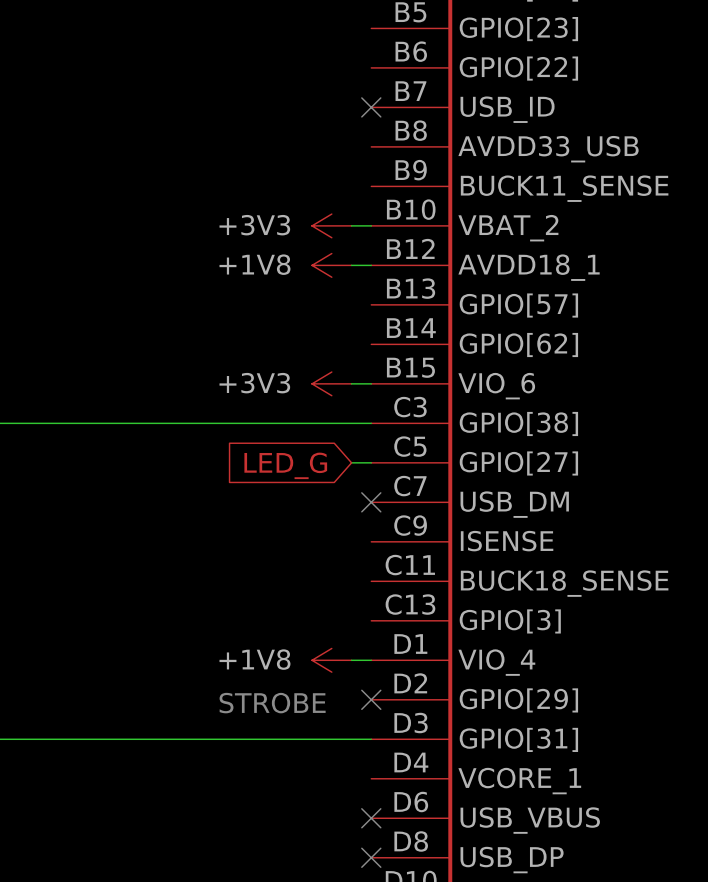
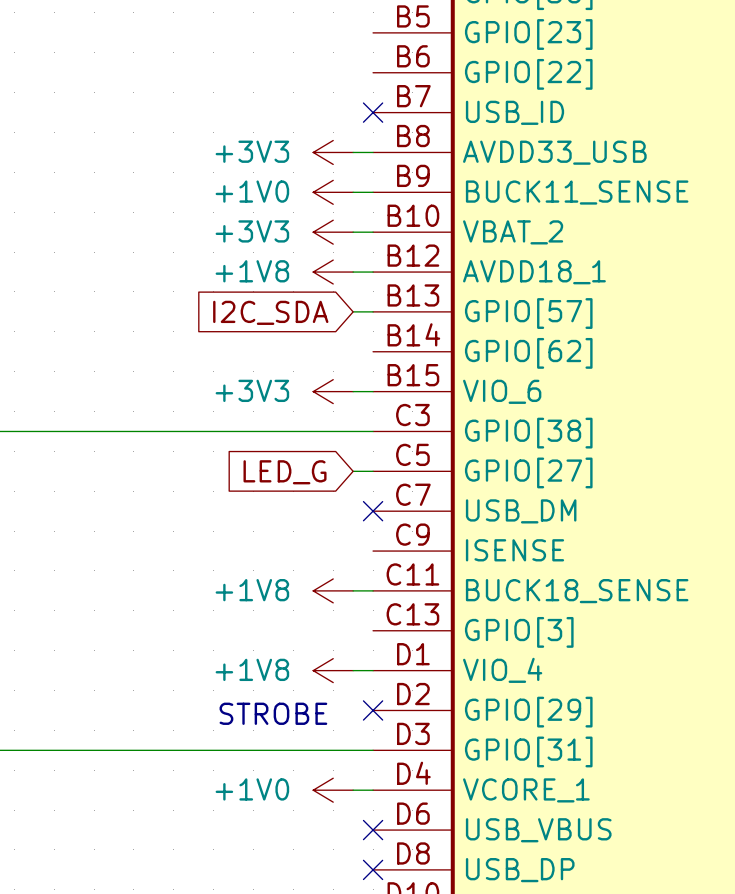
power symbol: none -> +3V3 (333, 152)
wire: none -> (353, 152) (373, 152)
power symbol: none -> +1V0 (333, 192)
wire: none -> (353, 192) (373, 192)
wire: none -> (353, 311) (373, 311)
global label: none -> I2C_SDA (270, 312)
power symbol: none -> +1V8 (333, 590)
wire: none -> (353, 590) (373, 590)
power symbol: none -> +1V0 (333, 790)
wire: none -> (353, 790) (373, 790)

